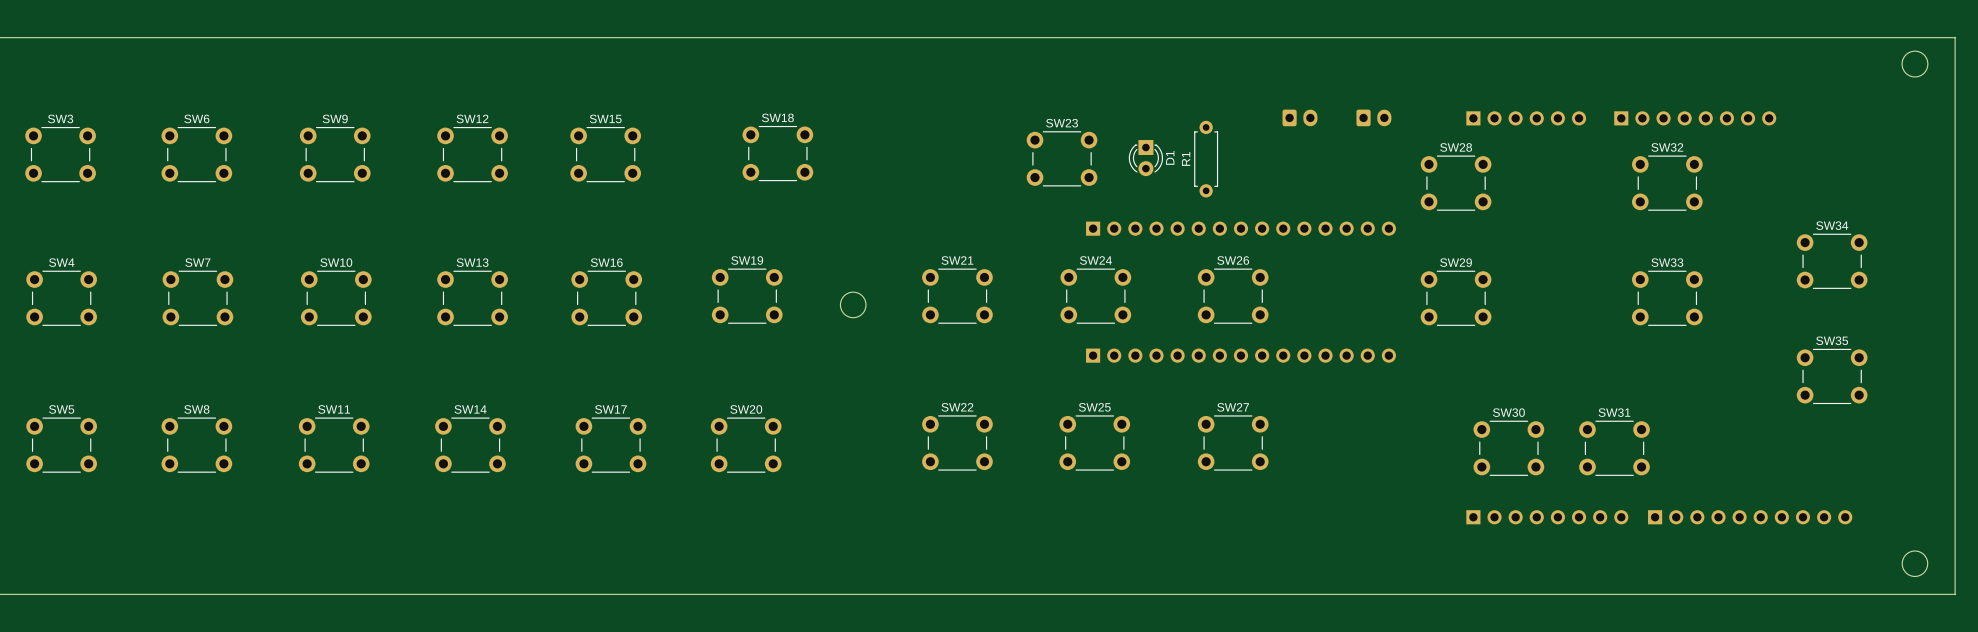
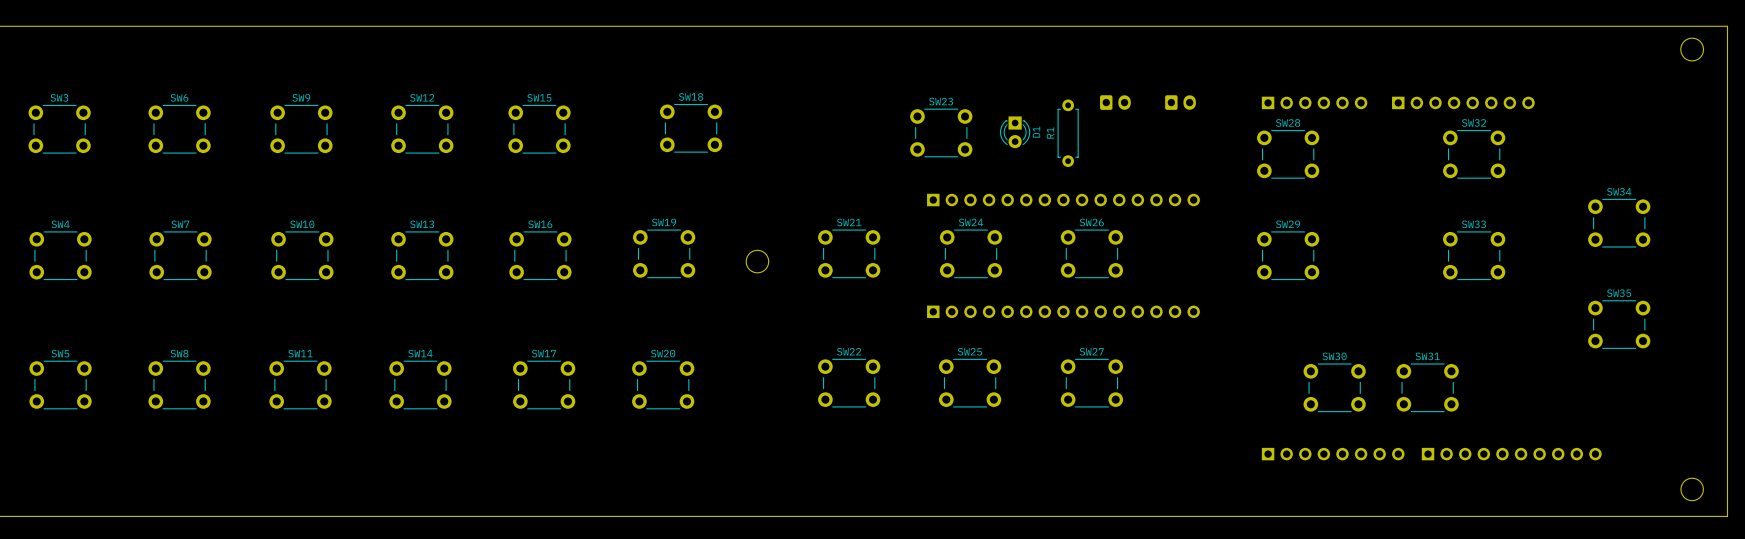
part: (1299, 117) -> none
part: (1373, 117) -> none
part position: (1526, 118) -> (1314, 102)
part position: (1695, 118) -> (1463, 102)
part: none -> (1115, 102)
part: none -> (1180, 102)
part position: (1240, 228) -> (1063, 200)
part position: (1240, 355) -> (1063, 311)
part position: (1547, 517) -> (1333, 454)
part position: (1750, 517) -> (1511, 454)

